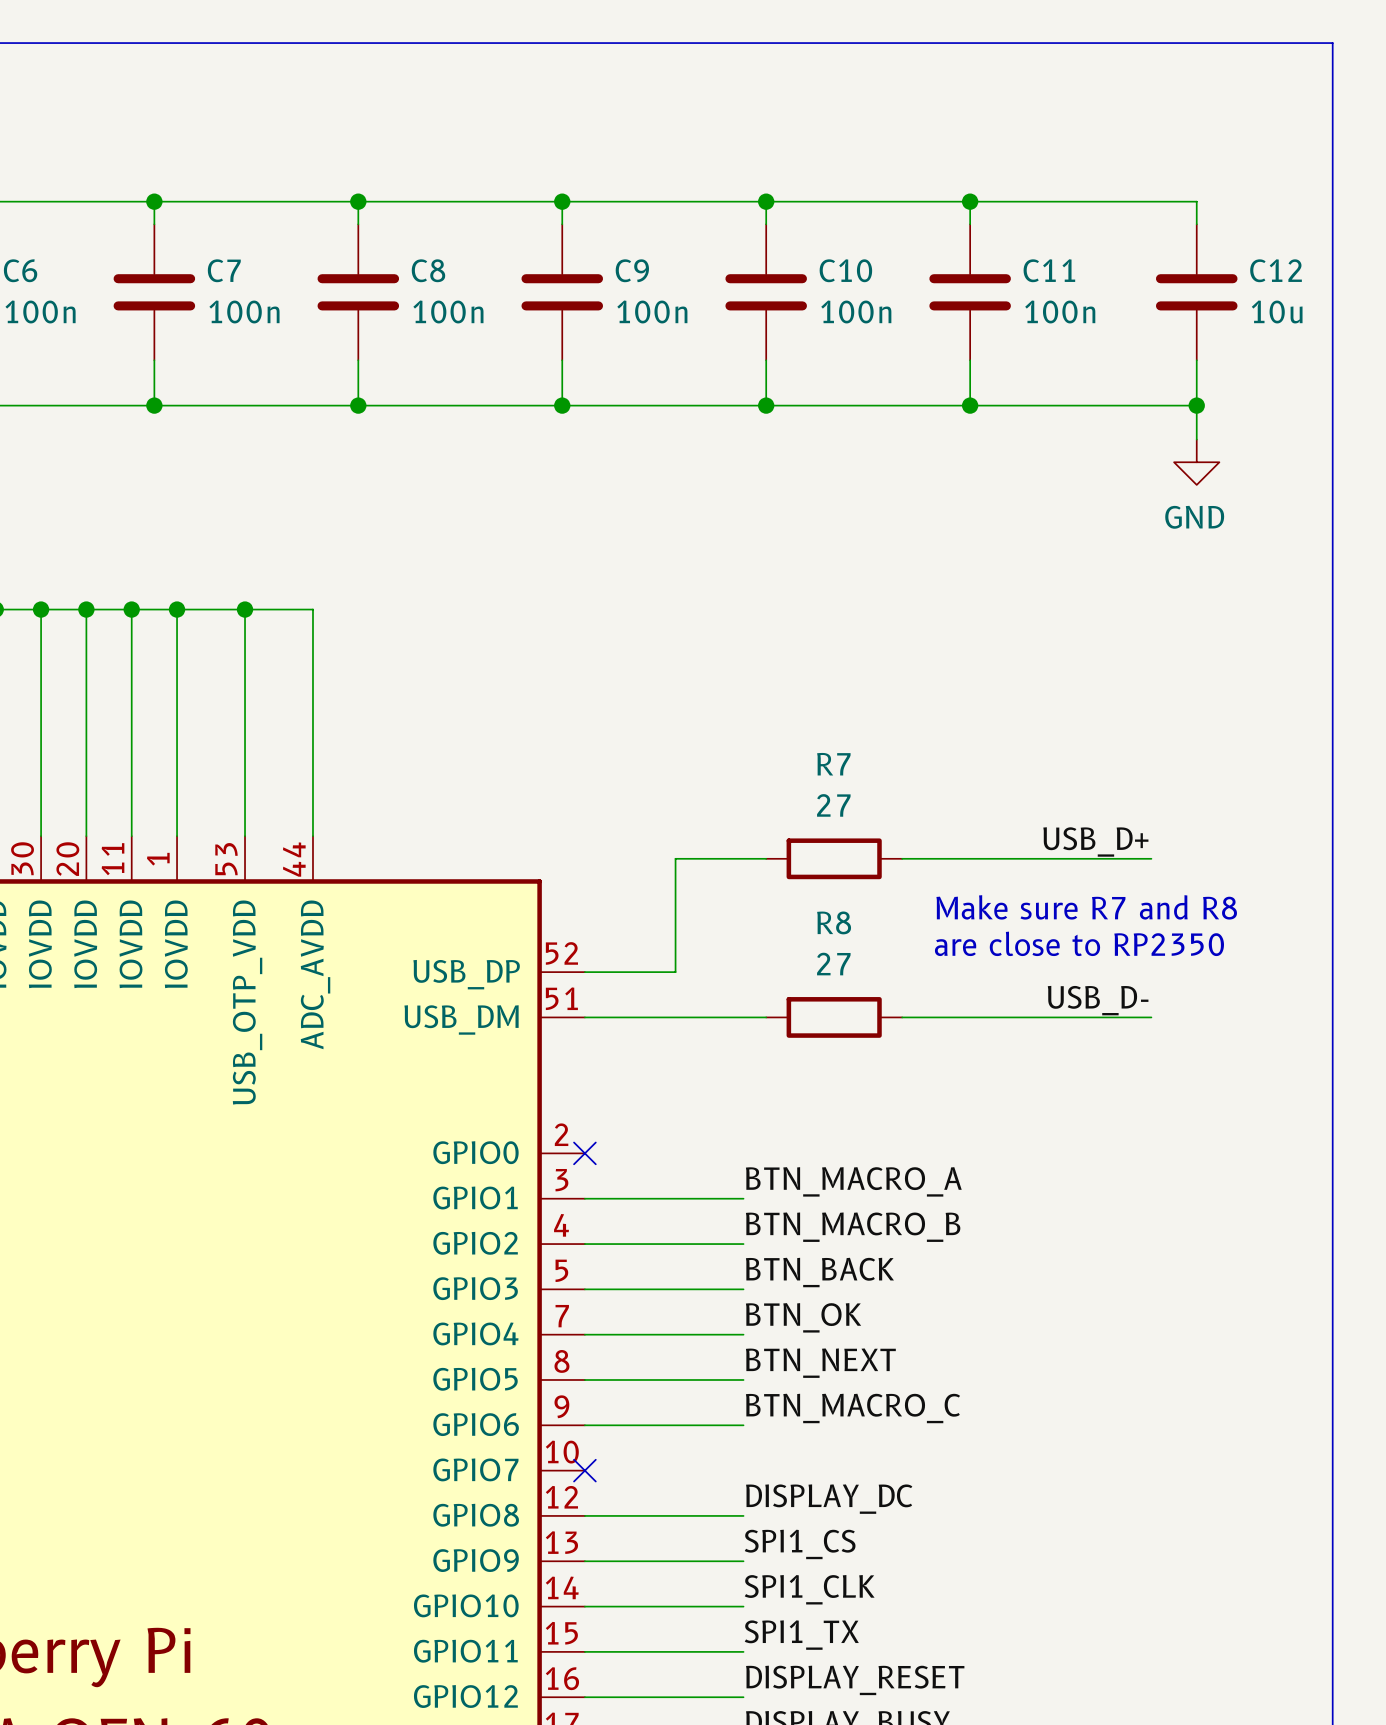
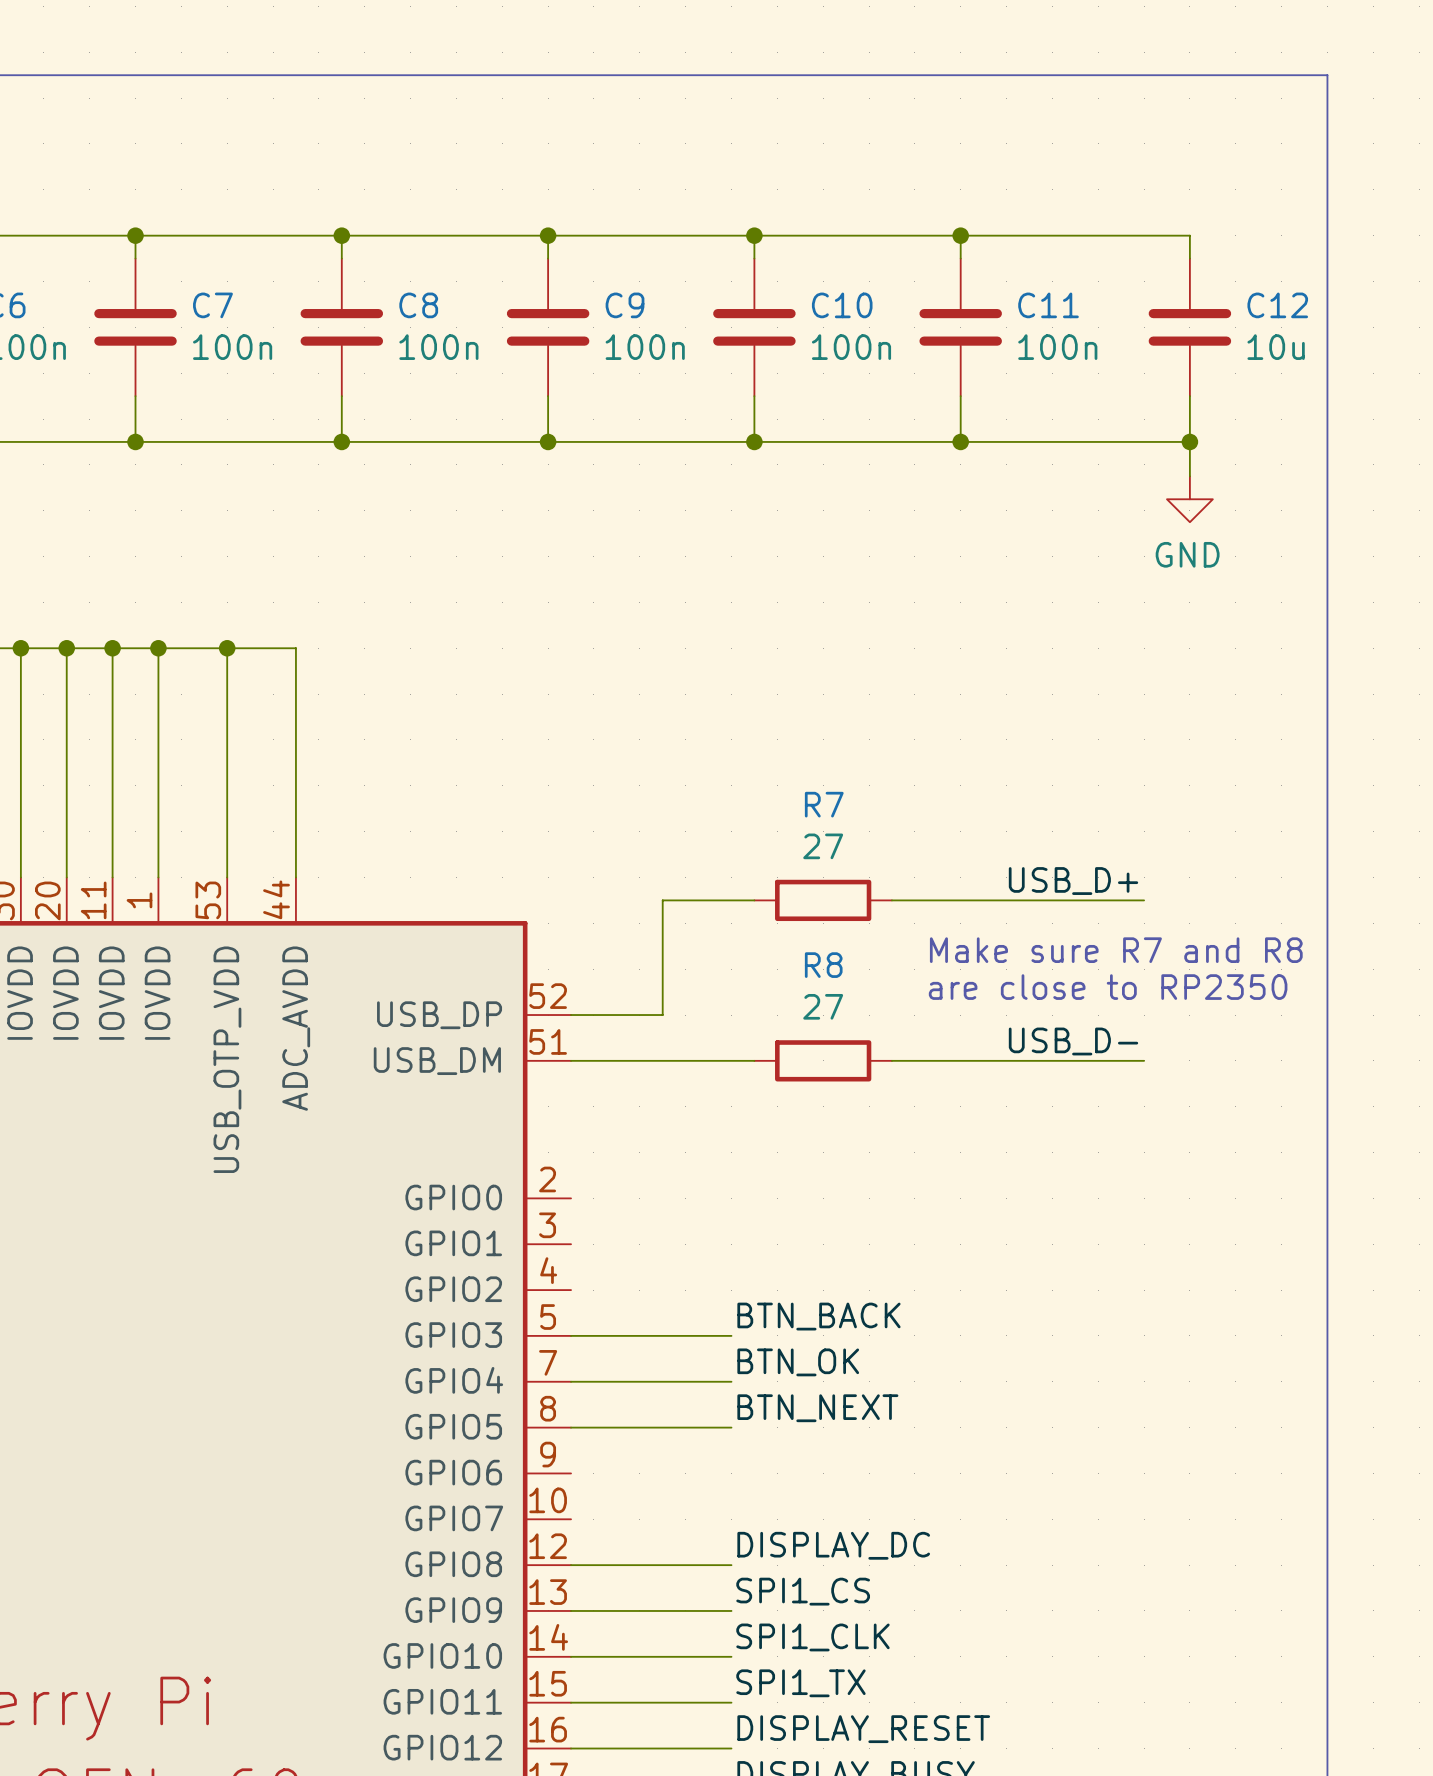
no-connect mark: (584, 1153) -> none
label: BTN_MACRO_A (853, 1181) -> none
wire: (584, 1198) (743, 1198) -> none
label: BTN_MACRO_B (853, 1227) -> none
wire: (584, 1244) (743, 1244) -> none
label: BTN_MACRO_C (852, 1408) -> none
wire: (584, 1425) (743, 1425) -> none
no-connect mark: (584, 1470) -> none

